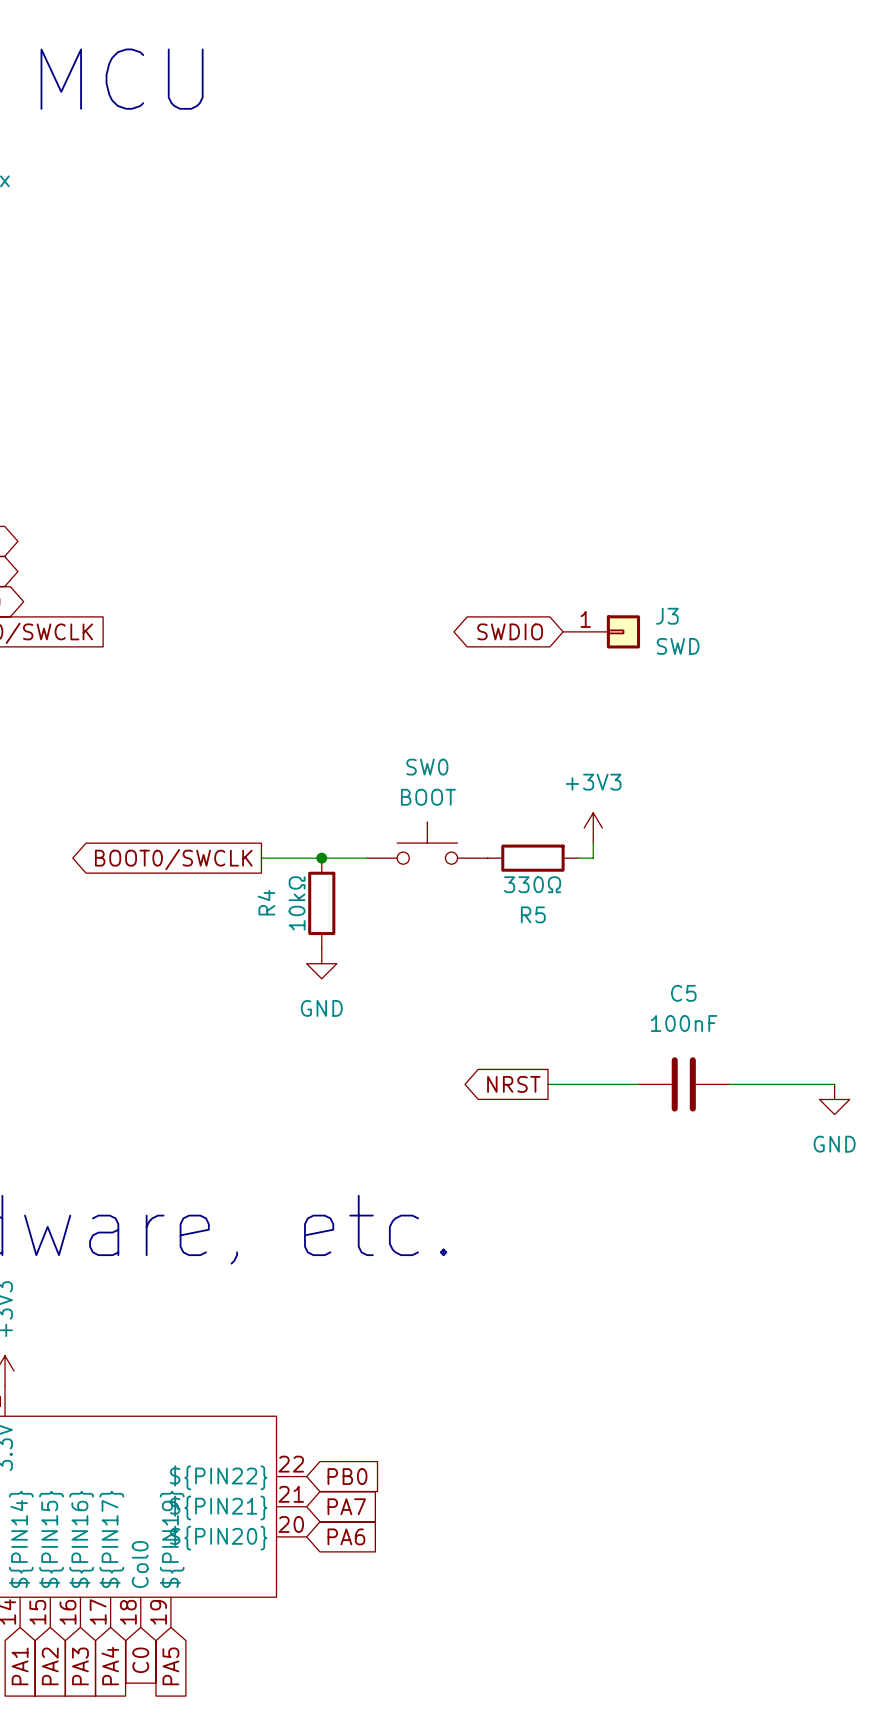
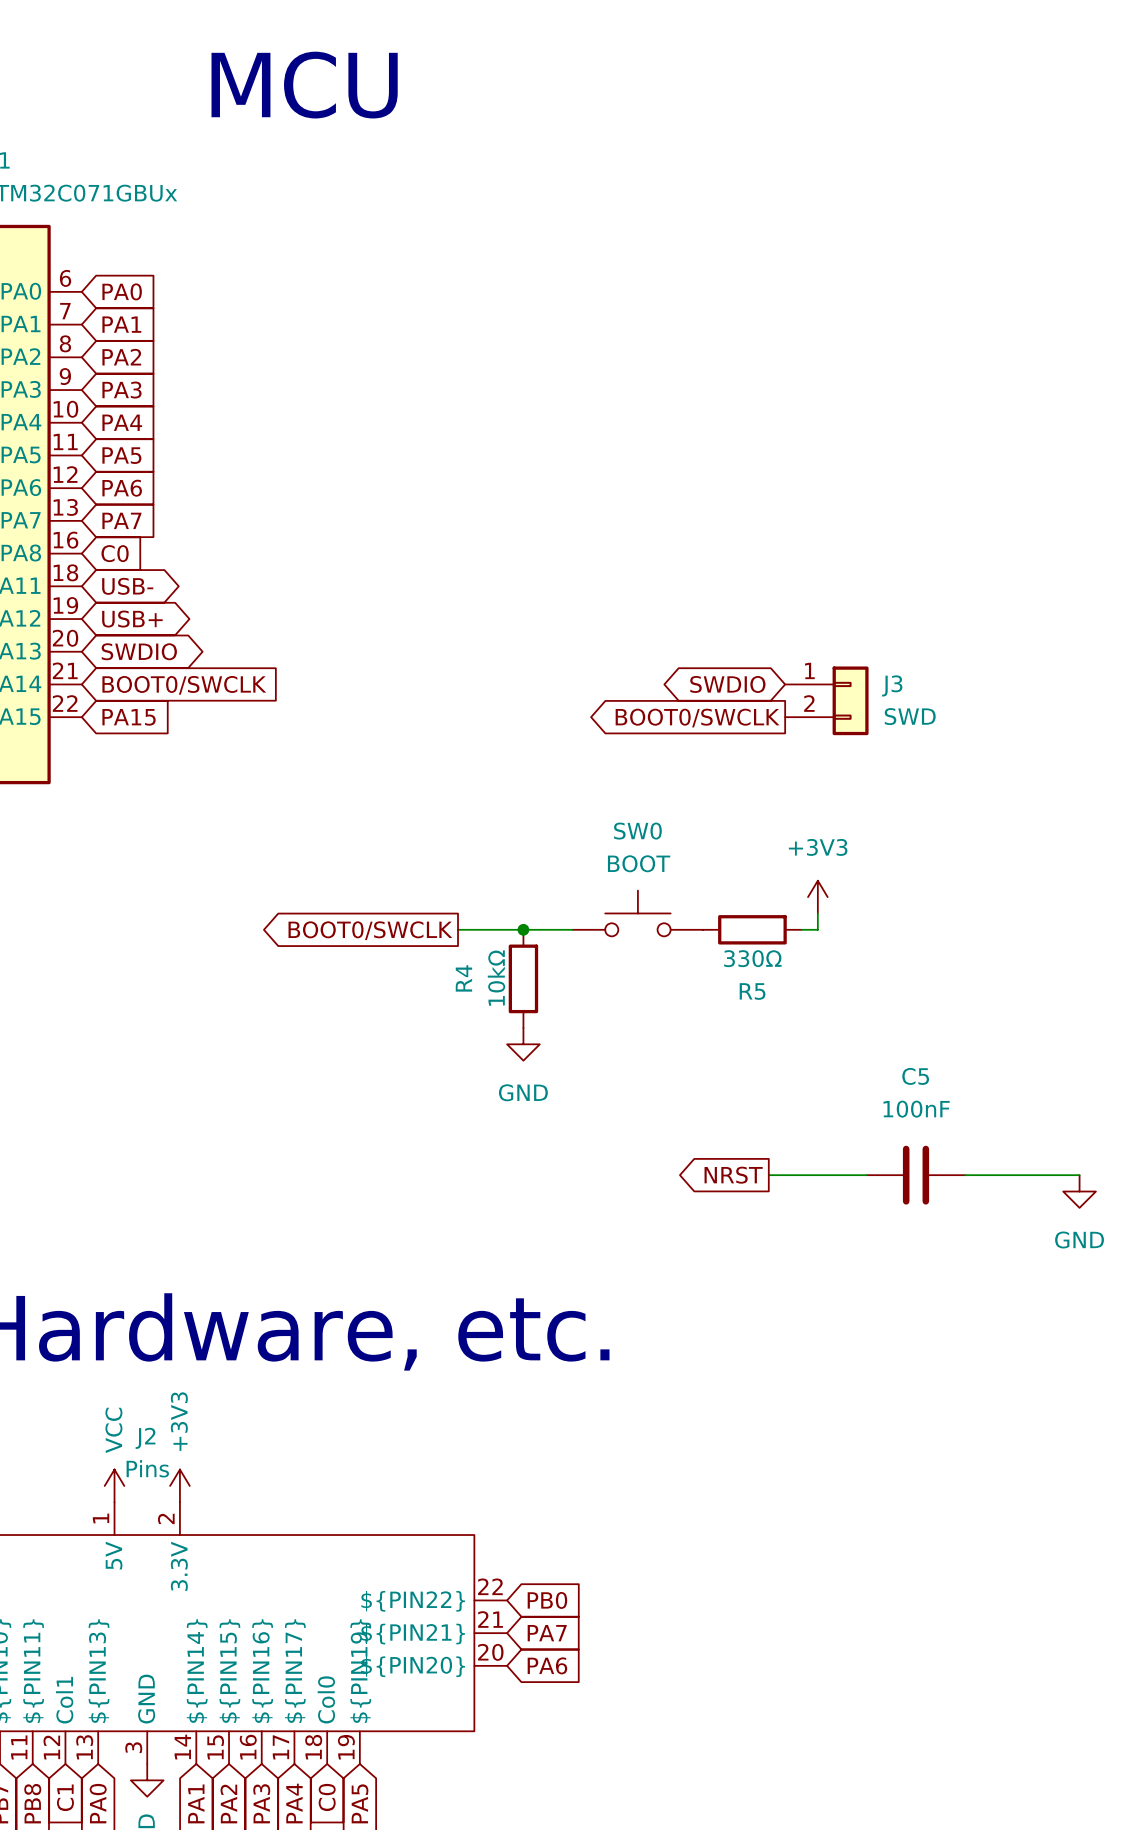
J3 symbol: [563, 615, 641, 649] -> [785, 666, 869, 736]
global label: none -> BOOT0/SWCLK (697, 718)

